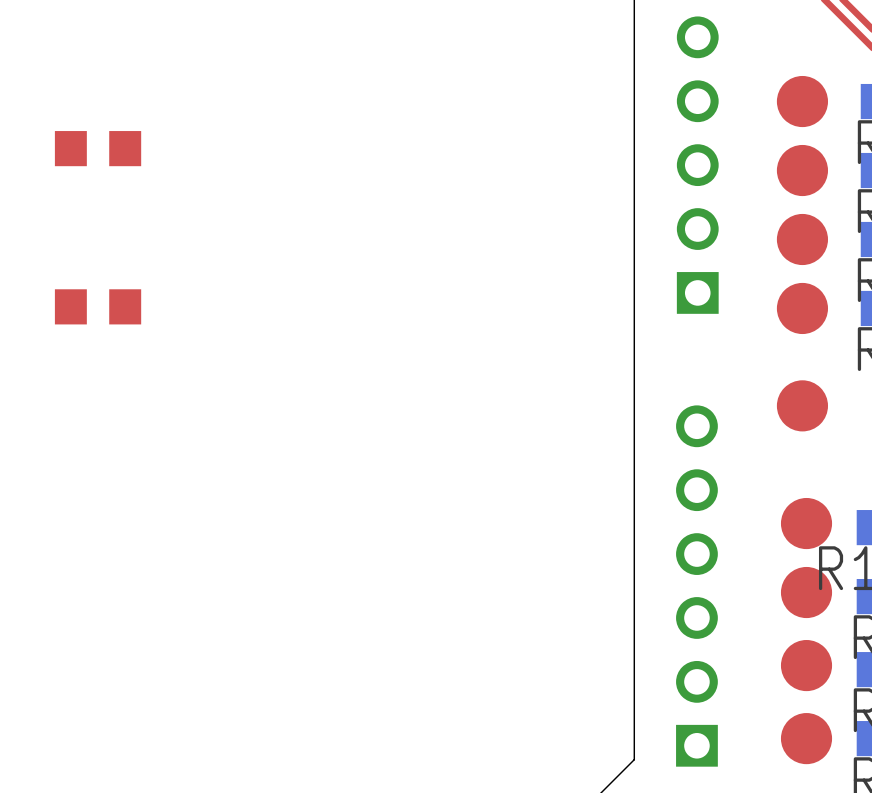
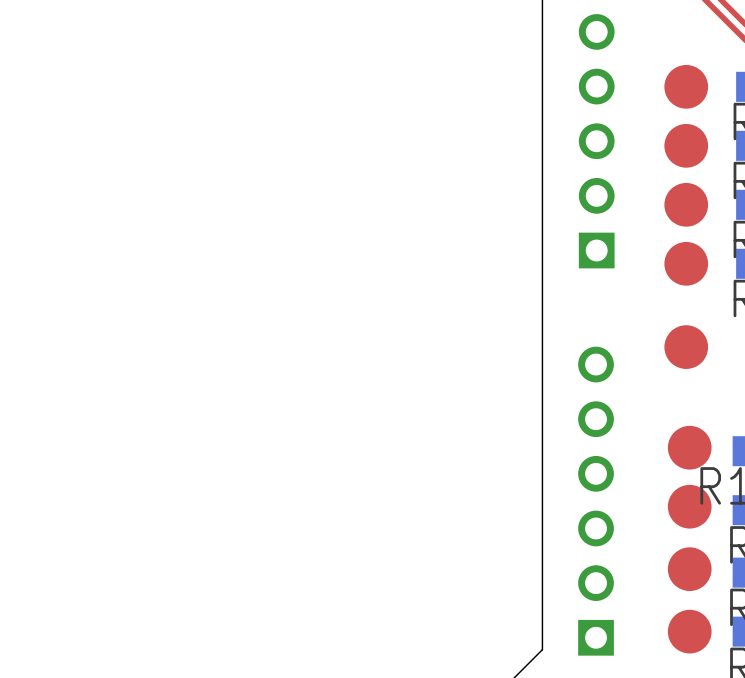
part: (98, 148) -> none
part: (98, 306) -> none

